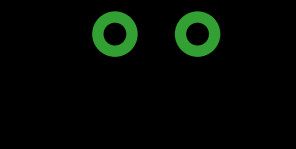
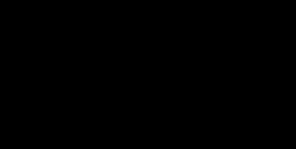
part: (156, 34) -> none

